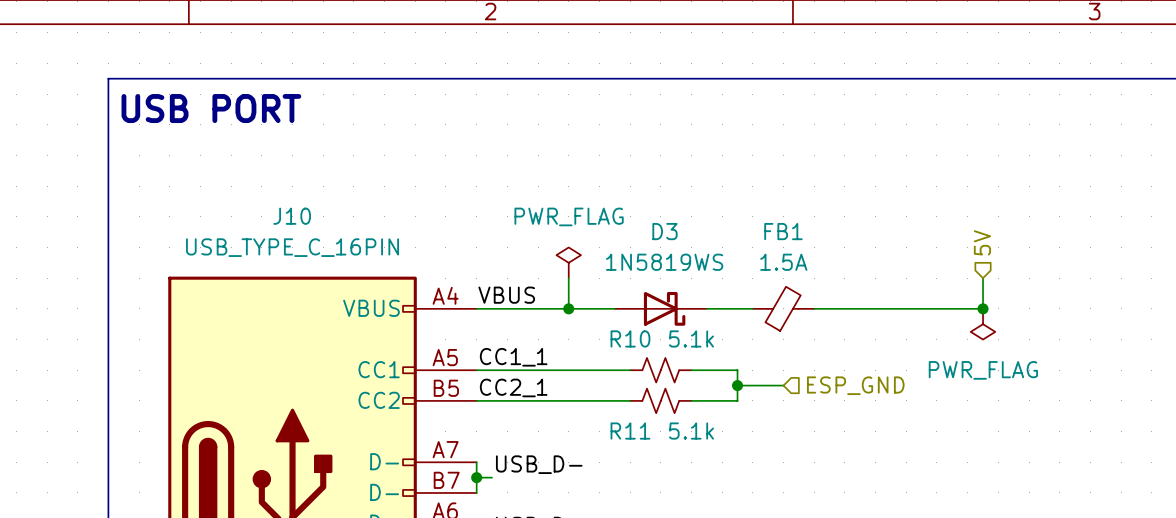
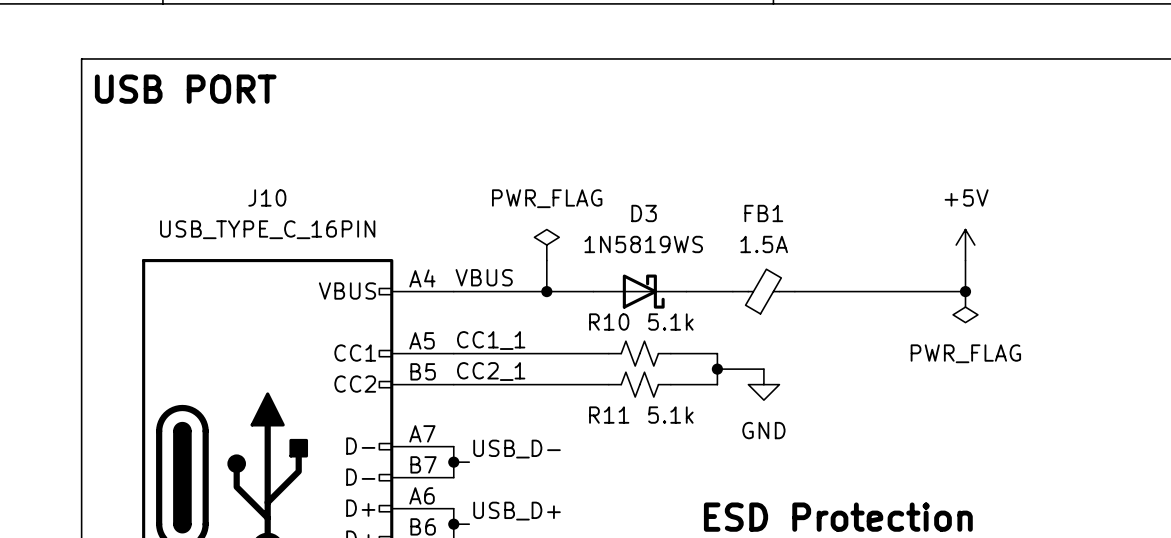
hierarchical label: 5V (982, 242) -> none
power symbol: none -> +5V (965, 245)
hierarchical label: ESP_GND (855, 385) -> none
power symbol: none -> GND (763, 384)

